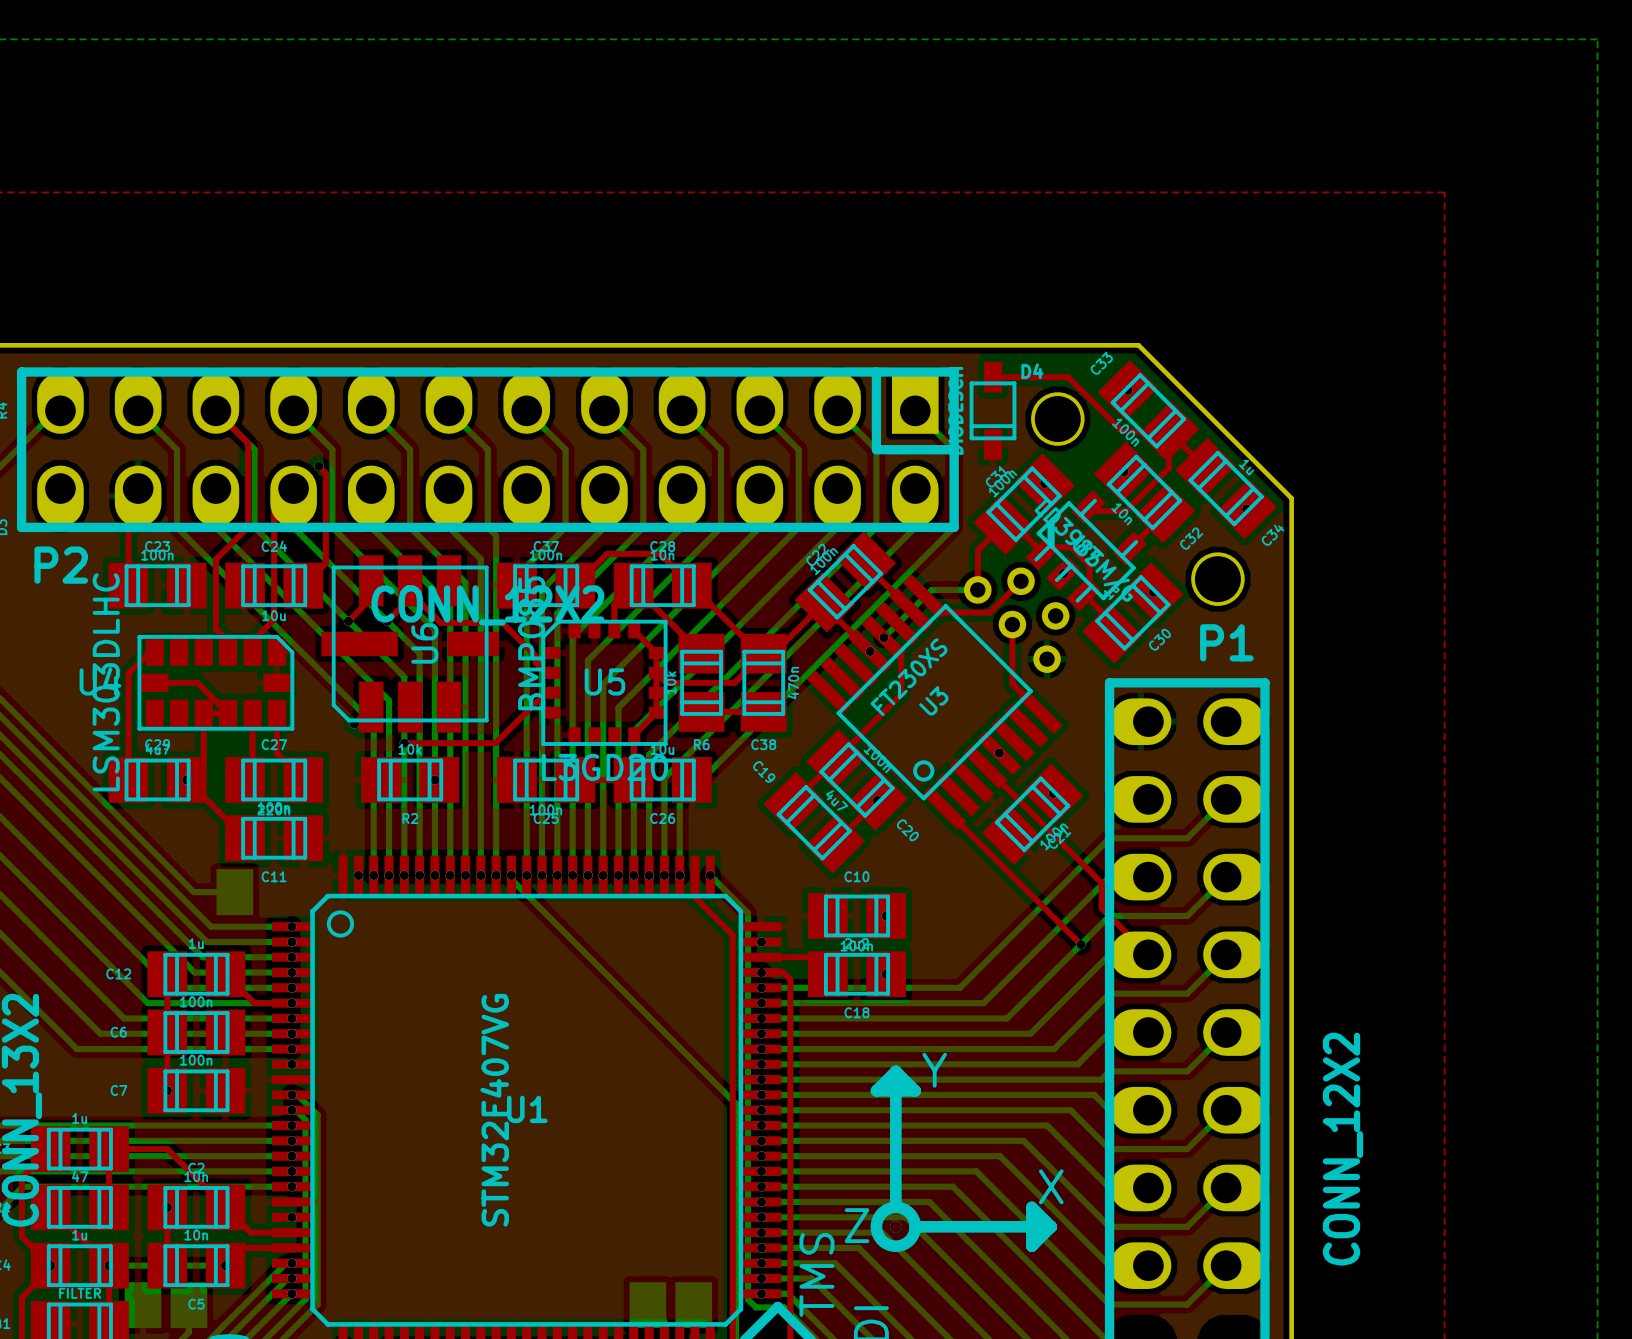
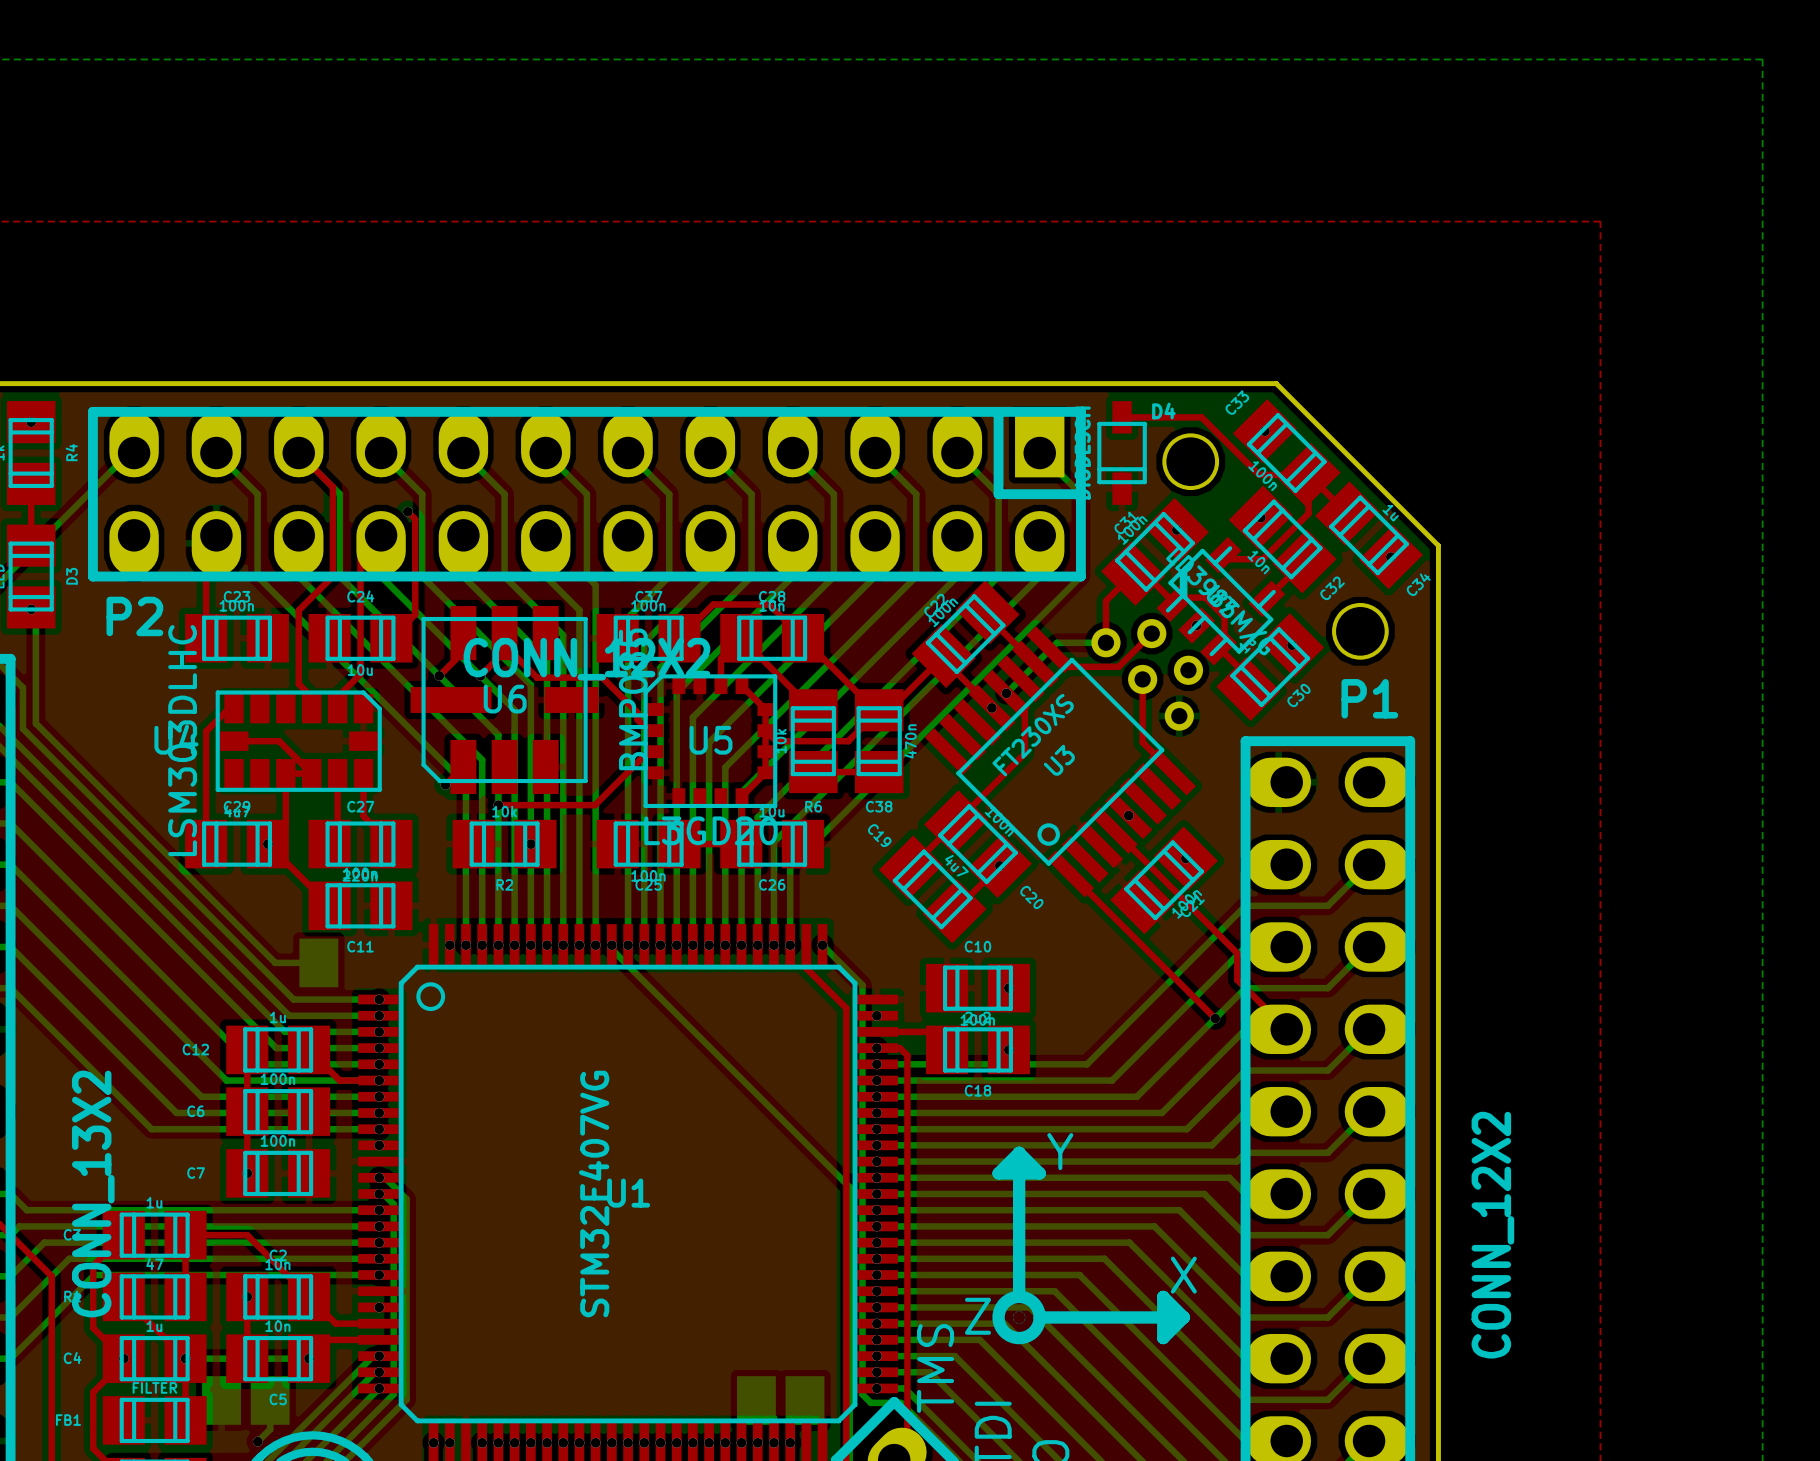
U6 name rotation: 0° (424, 643) -> 90° clockwise (505, 699)

